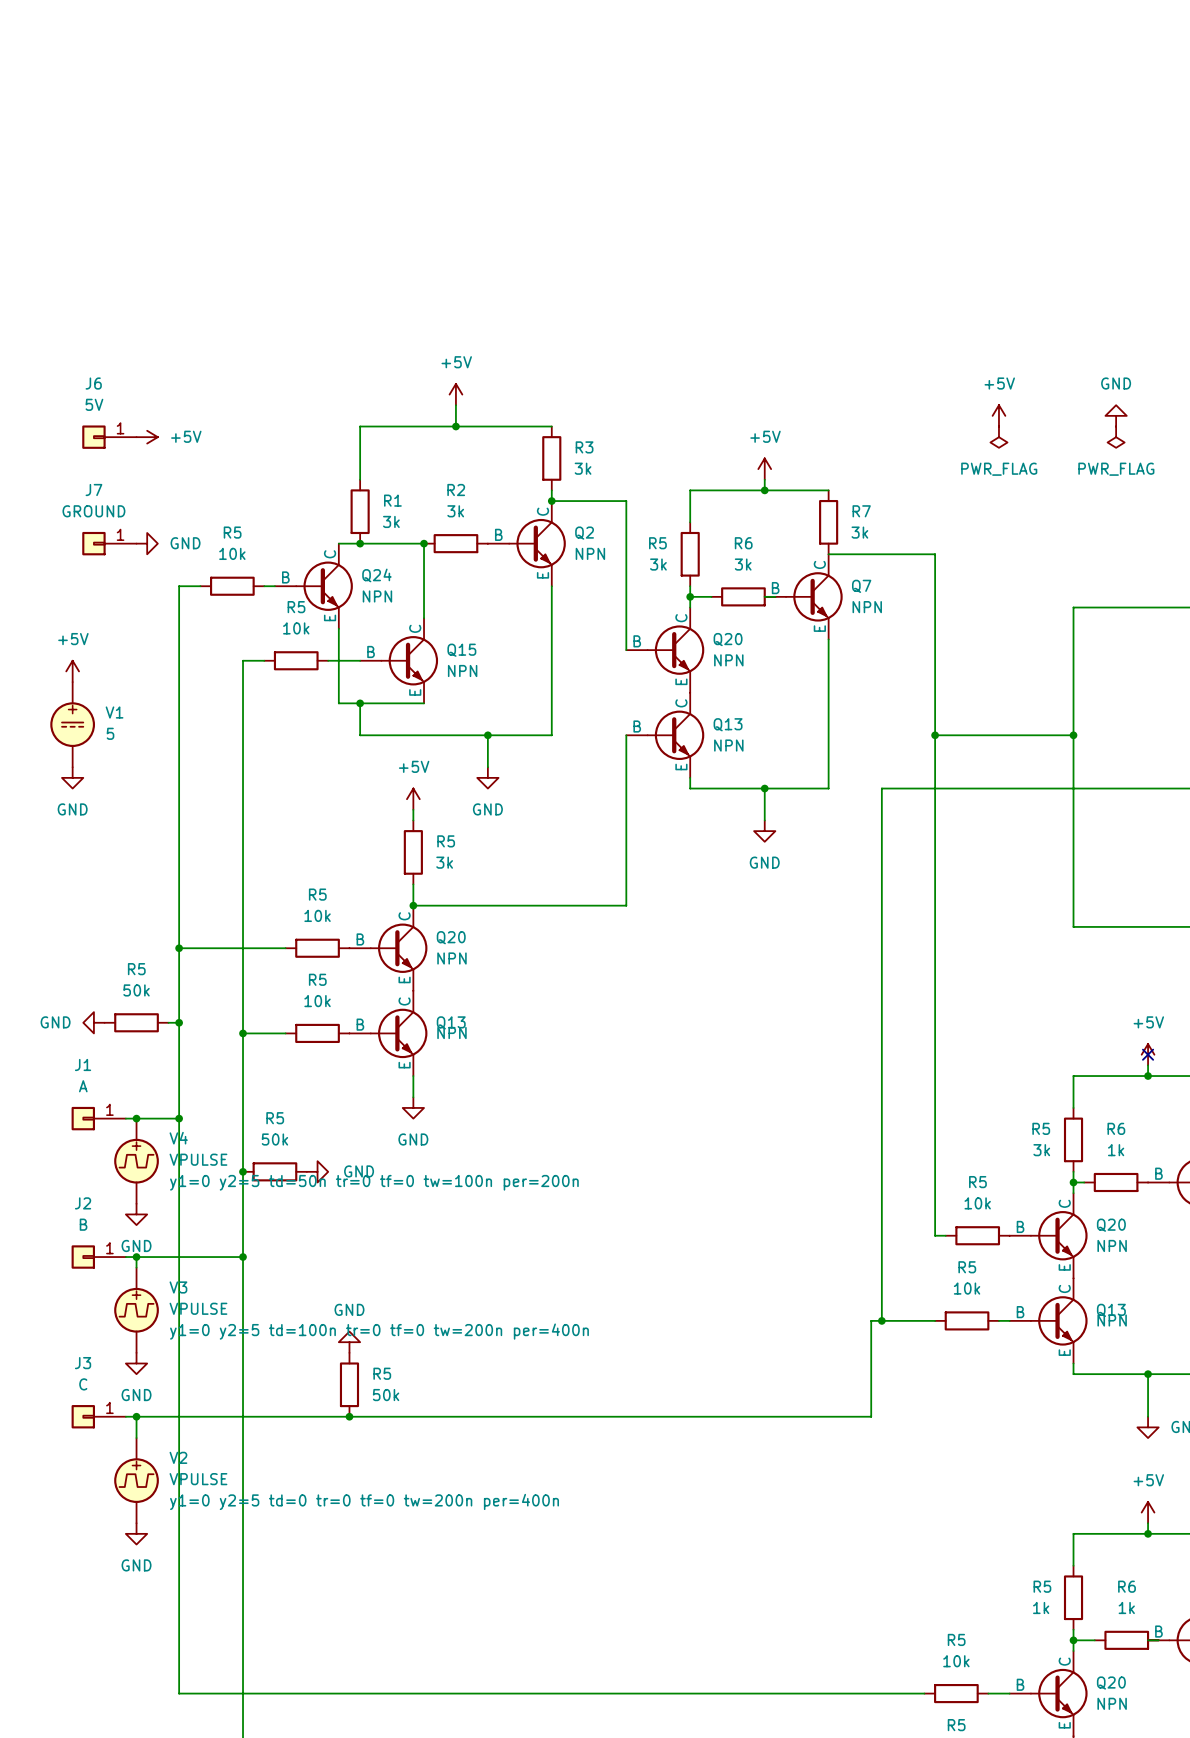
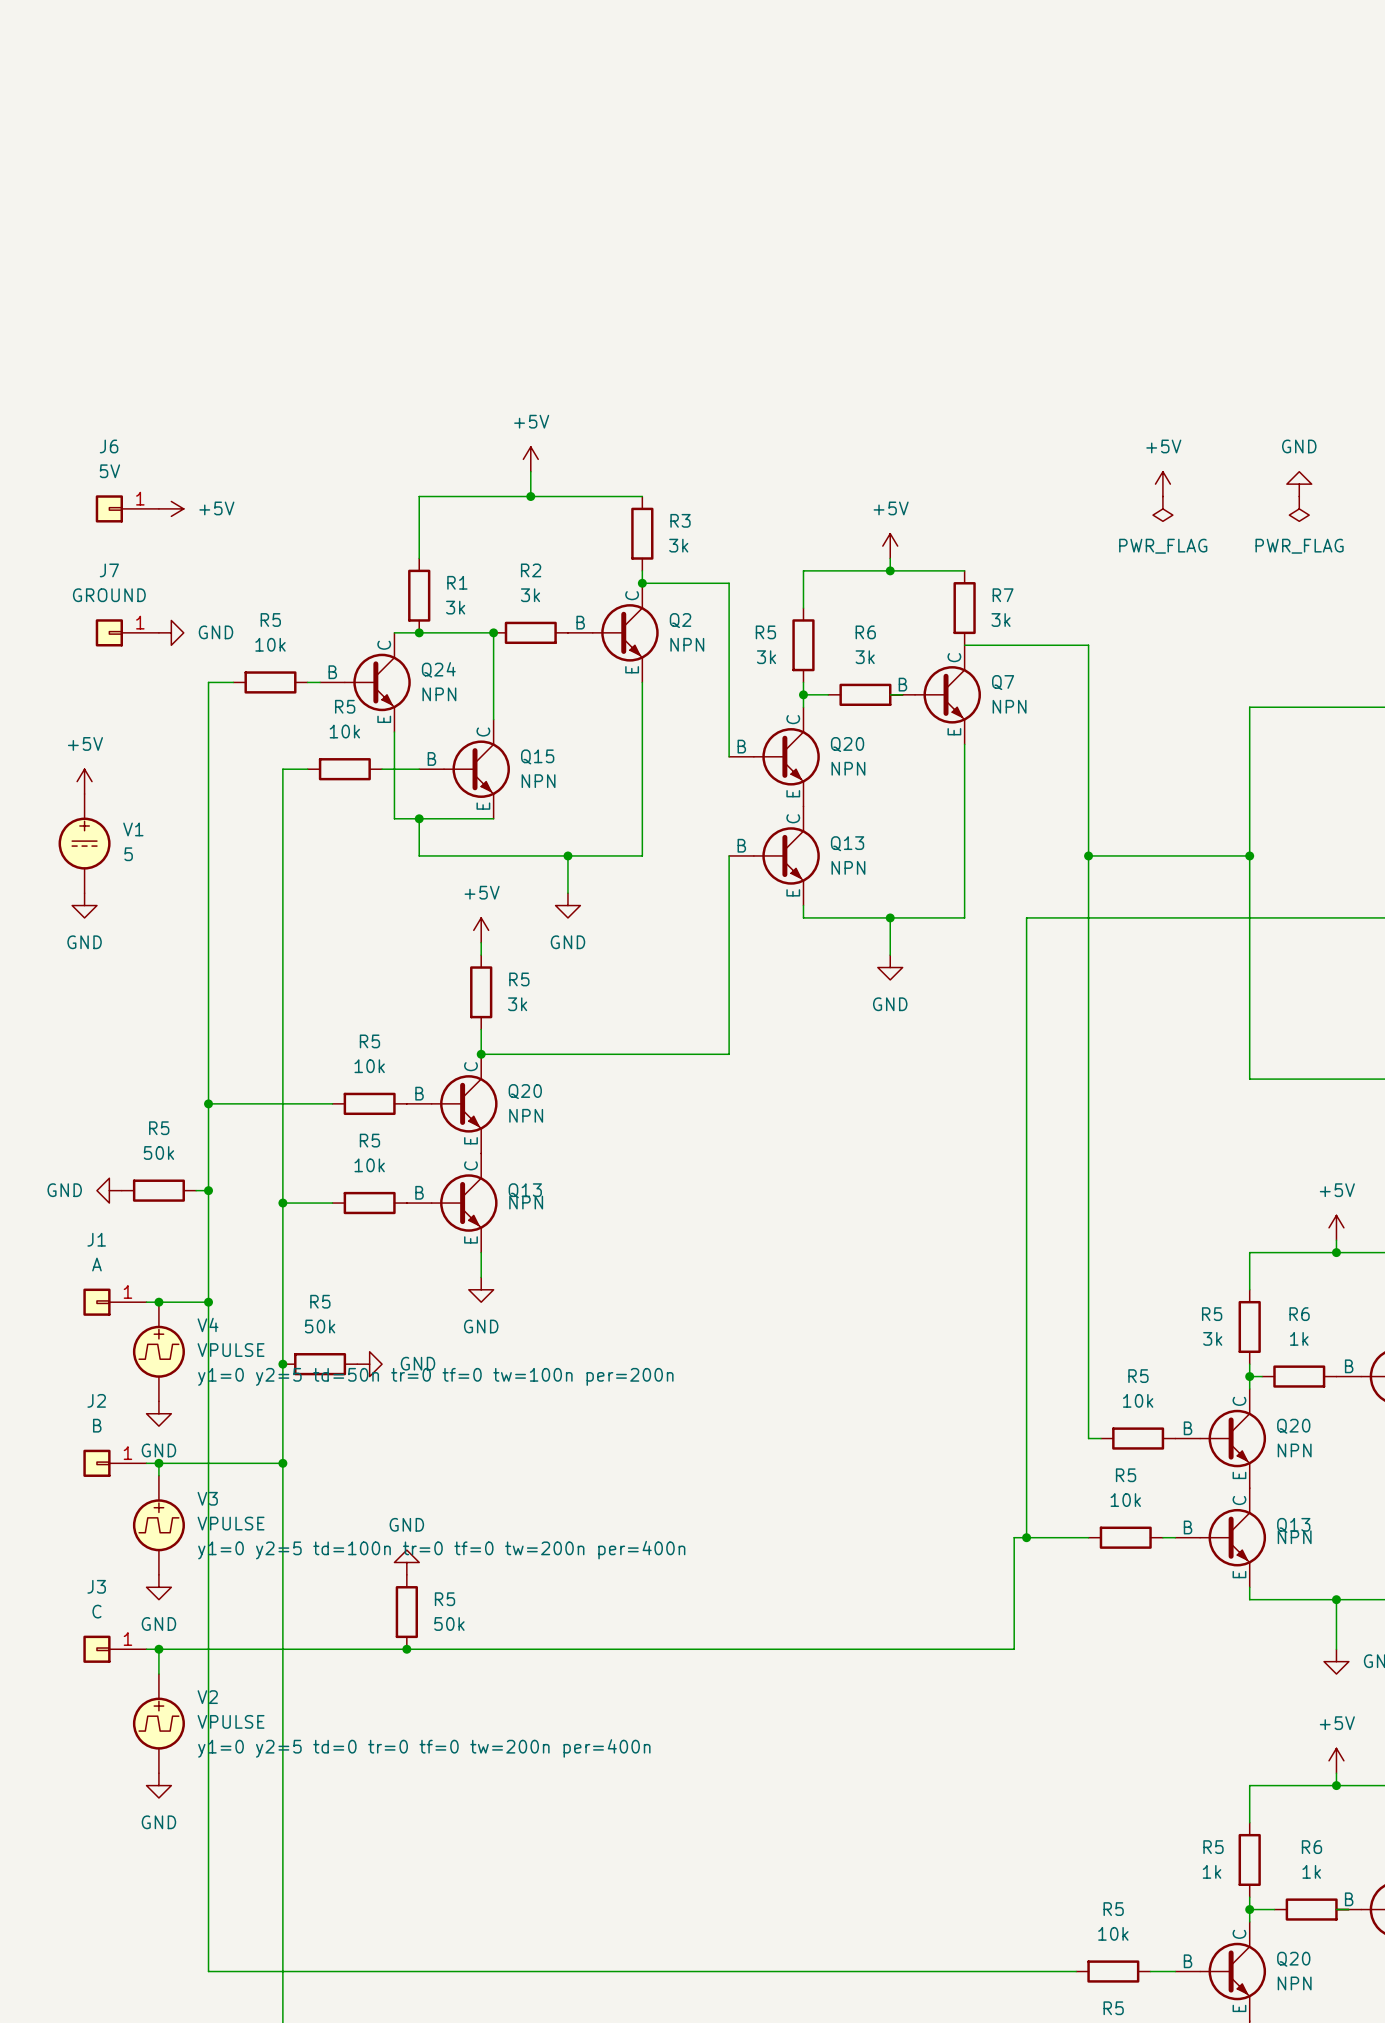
no-connect mark: (1148, 1054) -> none

